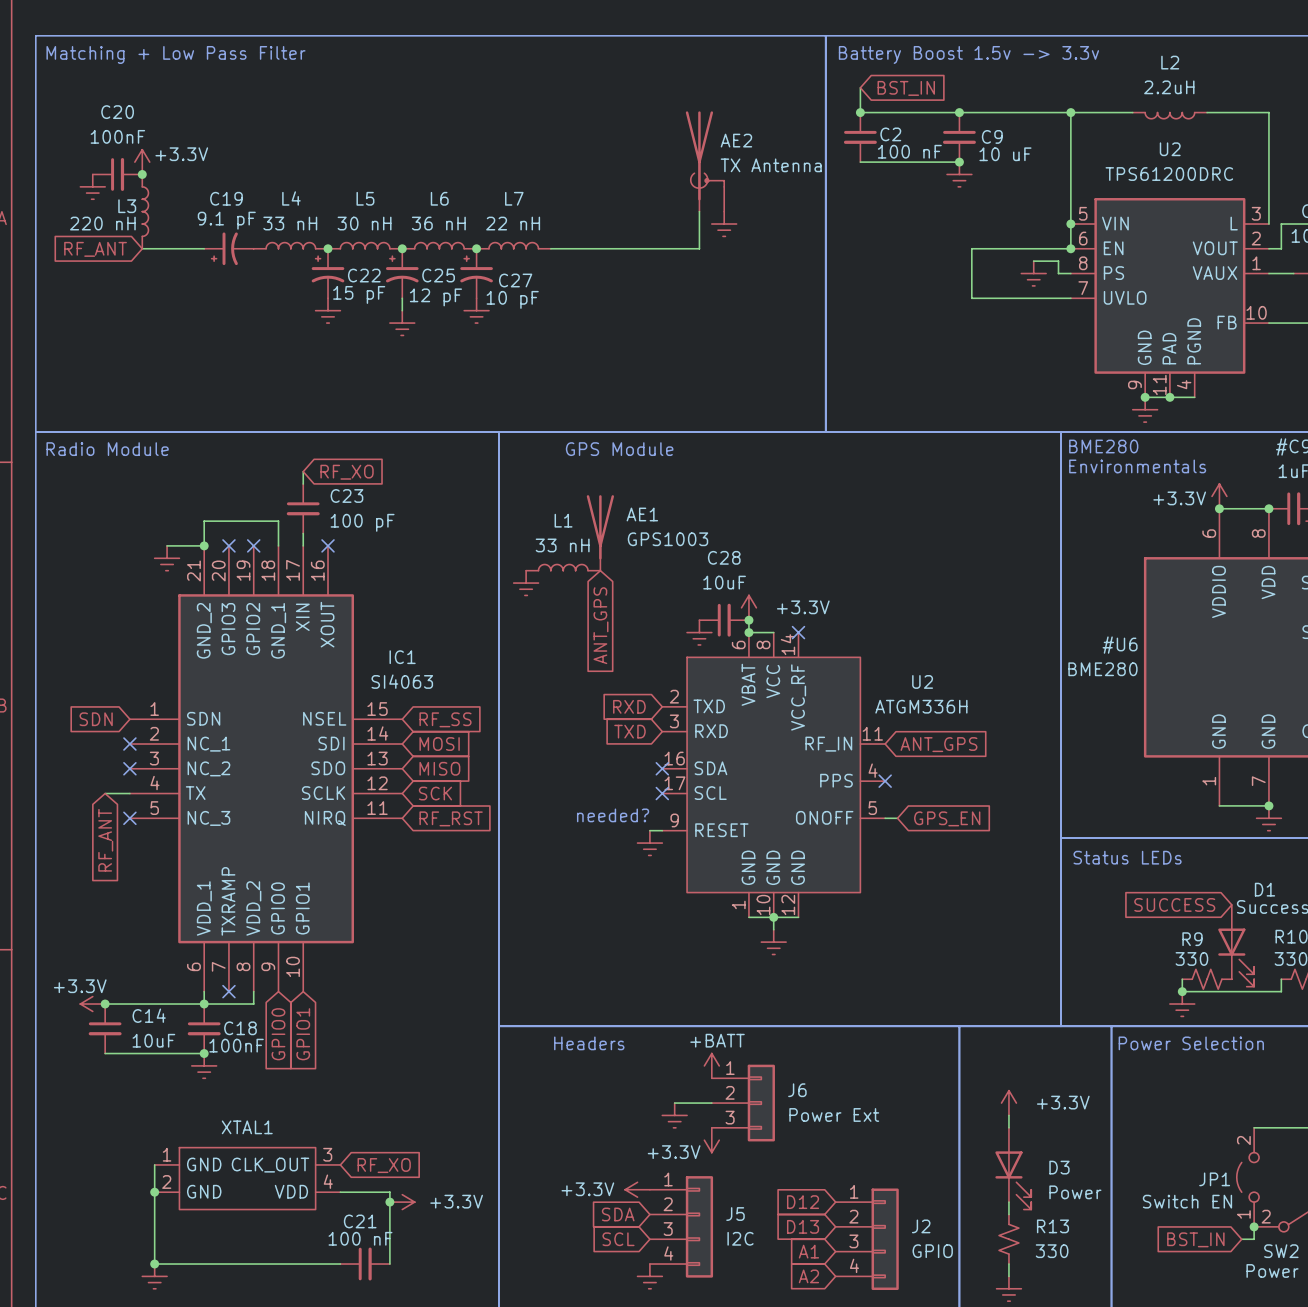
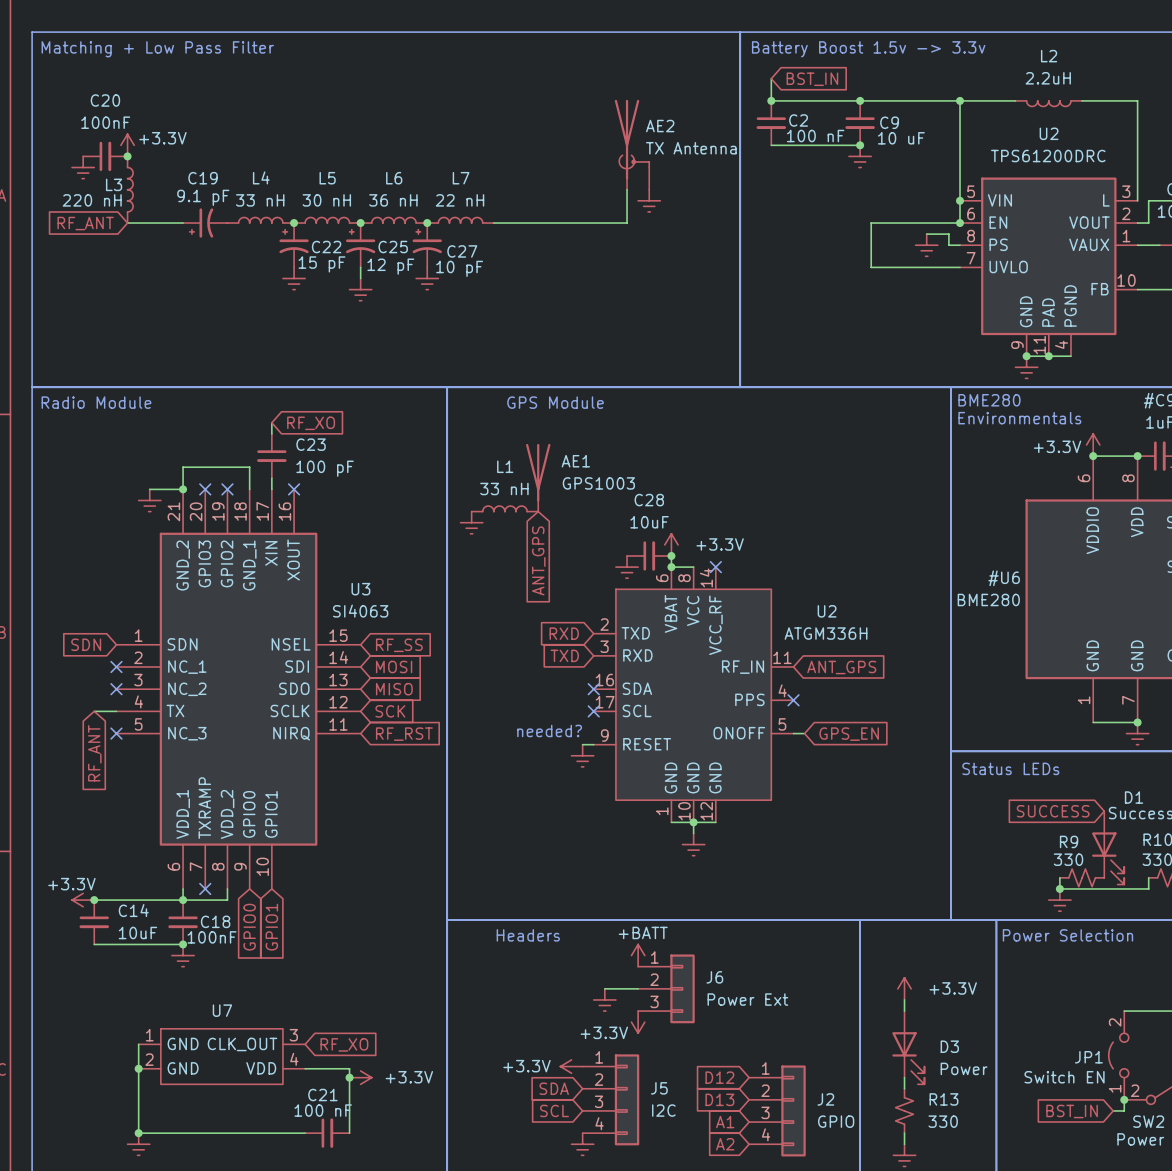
IC1 name: IC1 (402, 657) -> U3 (360, 589)
XTAL1 name: XTAL1 (247, 1127) -> U7 (222, 1010)

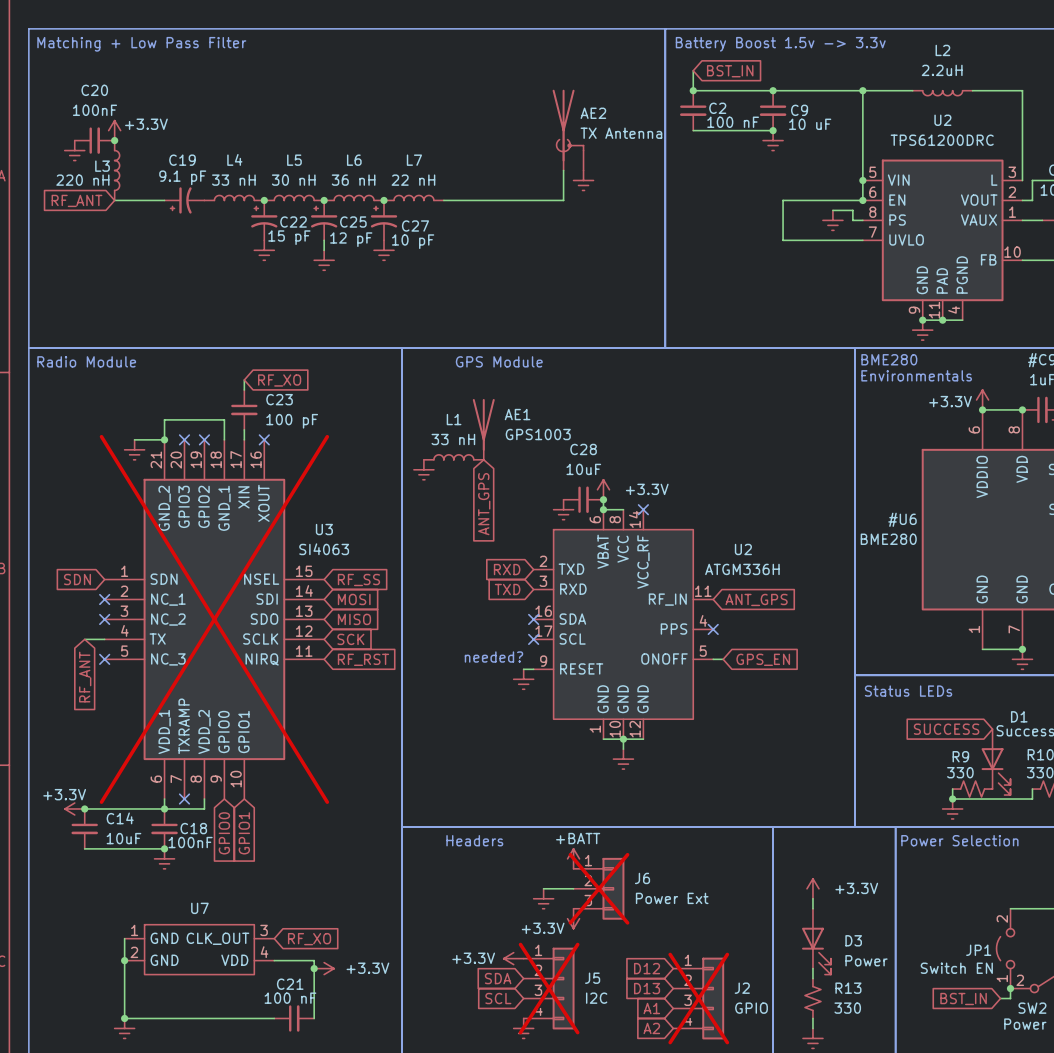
U3 do-not-place cross: none -> (214, 619)
J6 do-not-place cross: none -> (598, 888)
J5 do-not-place cross: none -> (549, 988)
J2 do-not-place cross: none -> (698, 998)

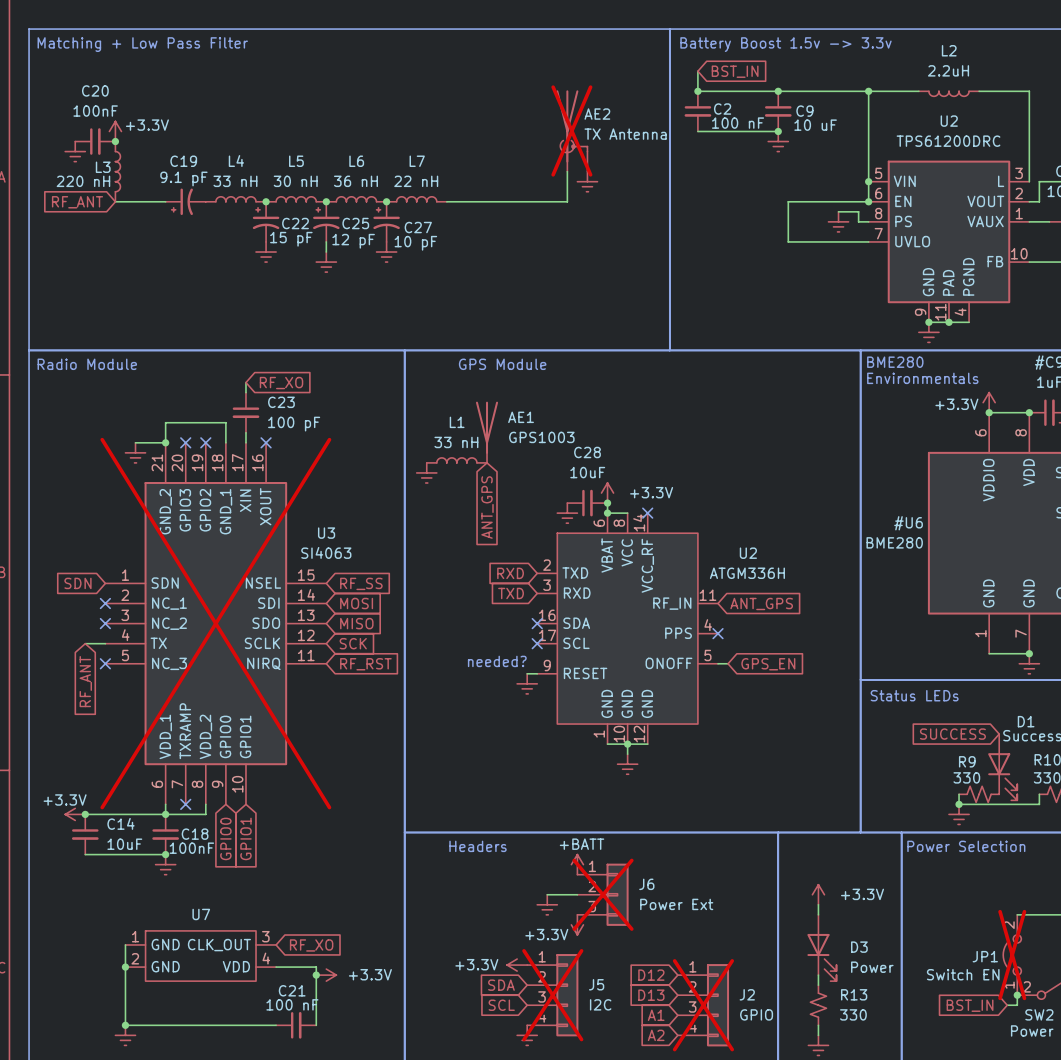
AE2 do-not-place cross: none -> (571, 130)
JP1 do-not-place cross: none -> (1012, 955)

